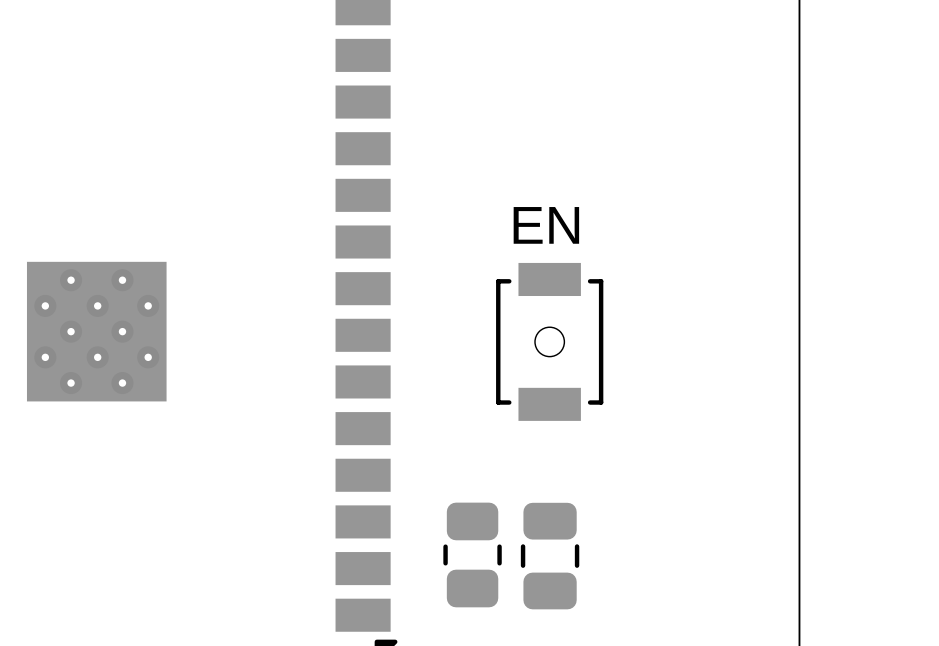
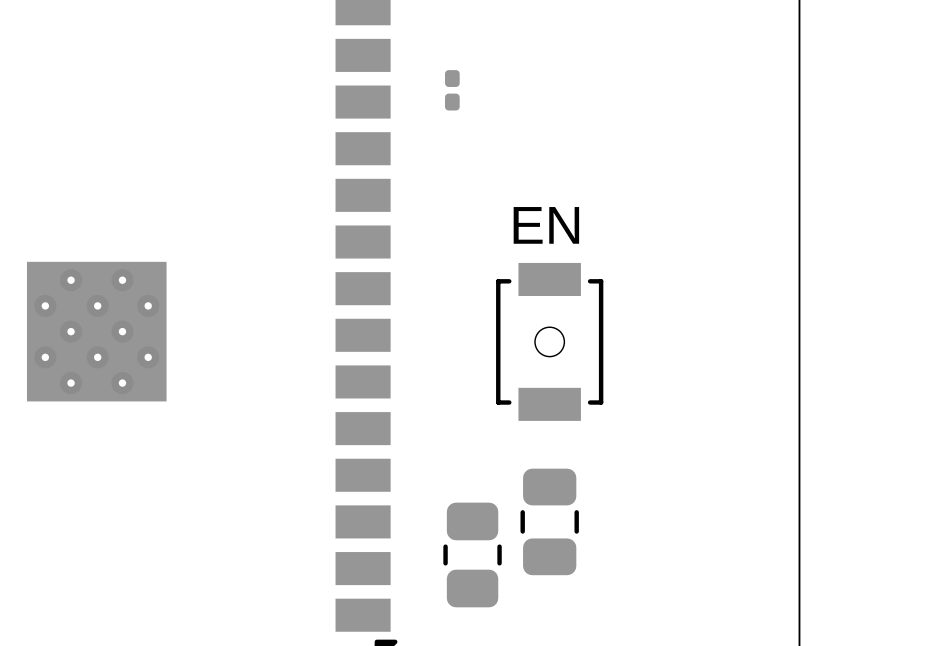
part: none -> (452, 90)
part position: (550, 556) -> (549, 521)

